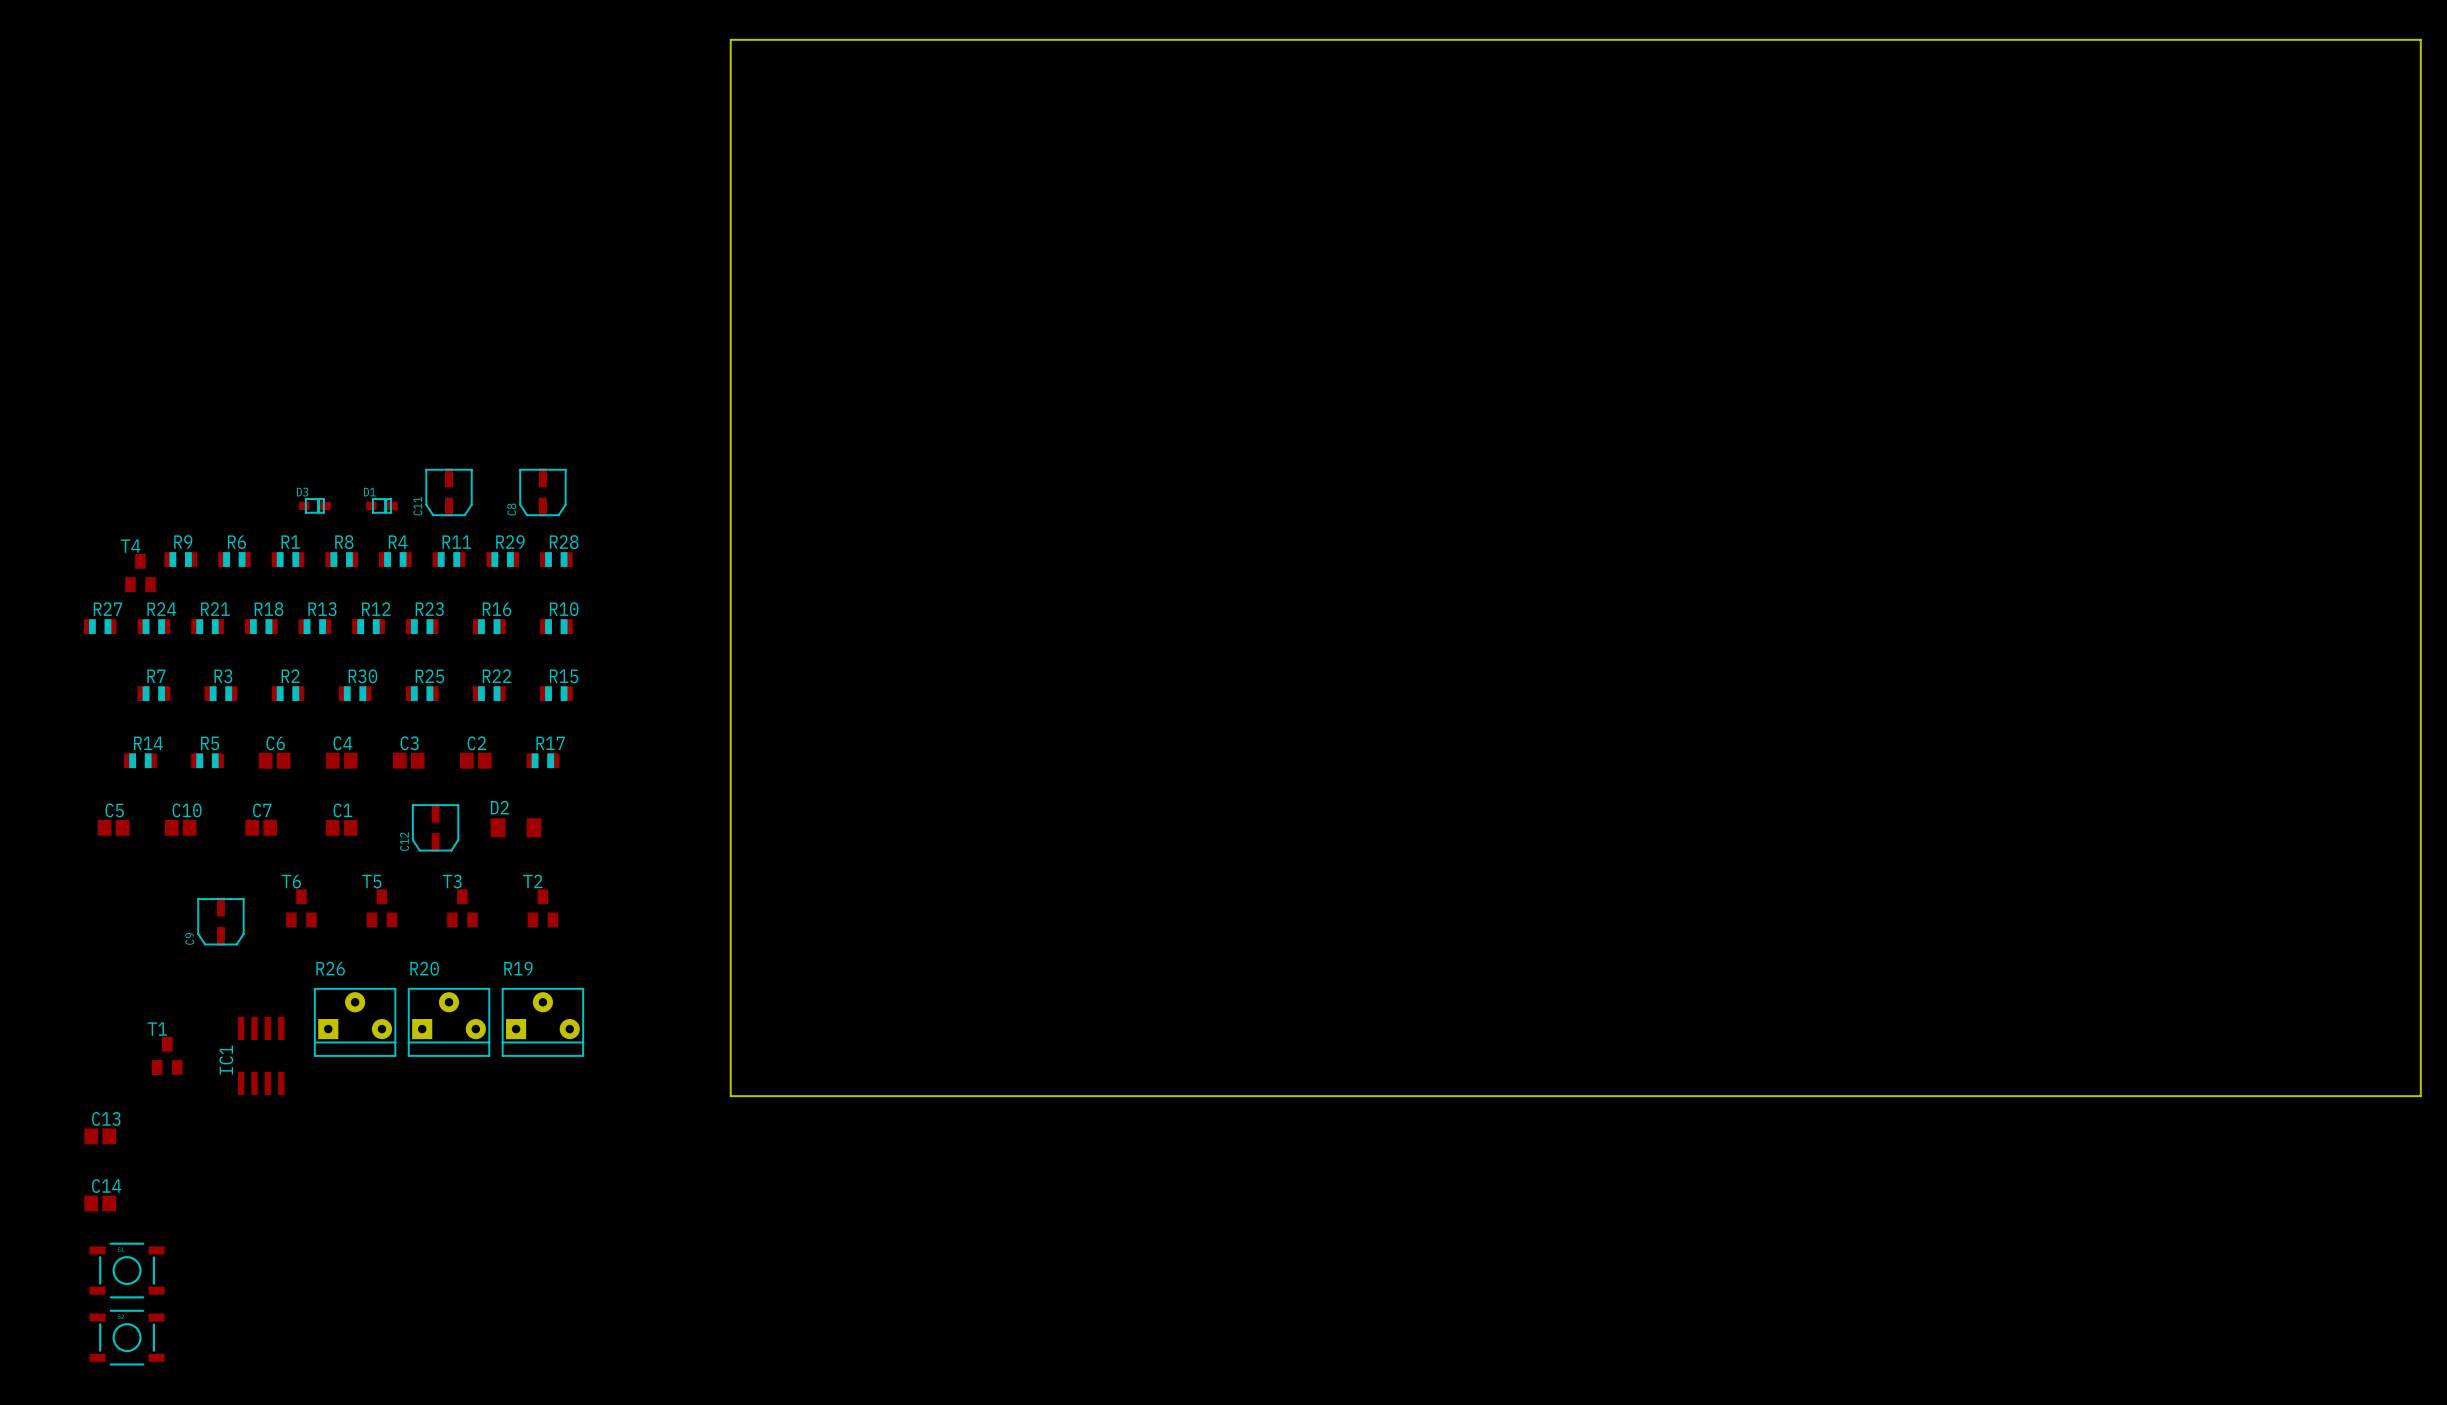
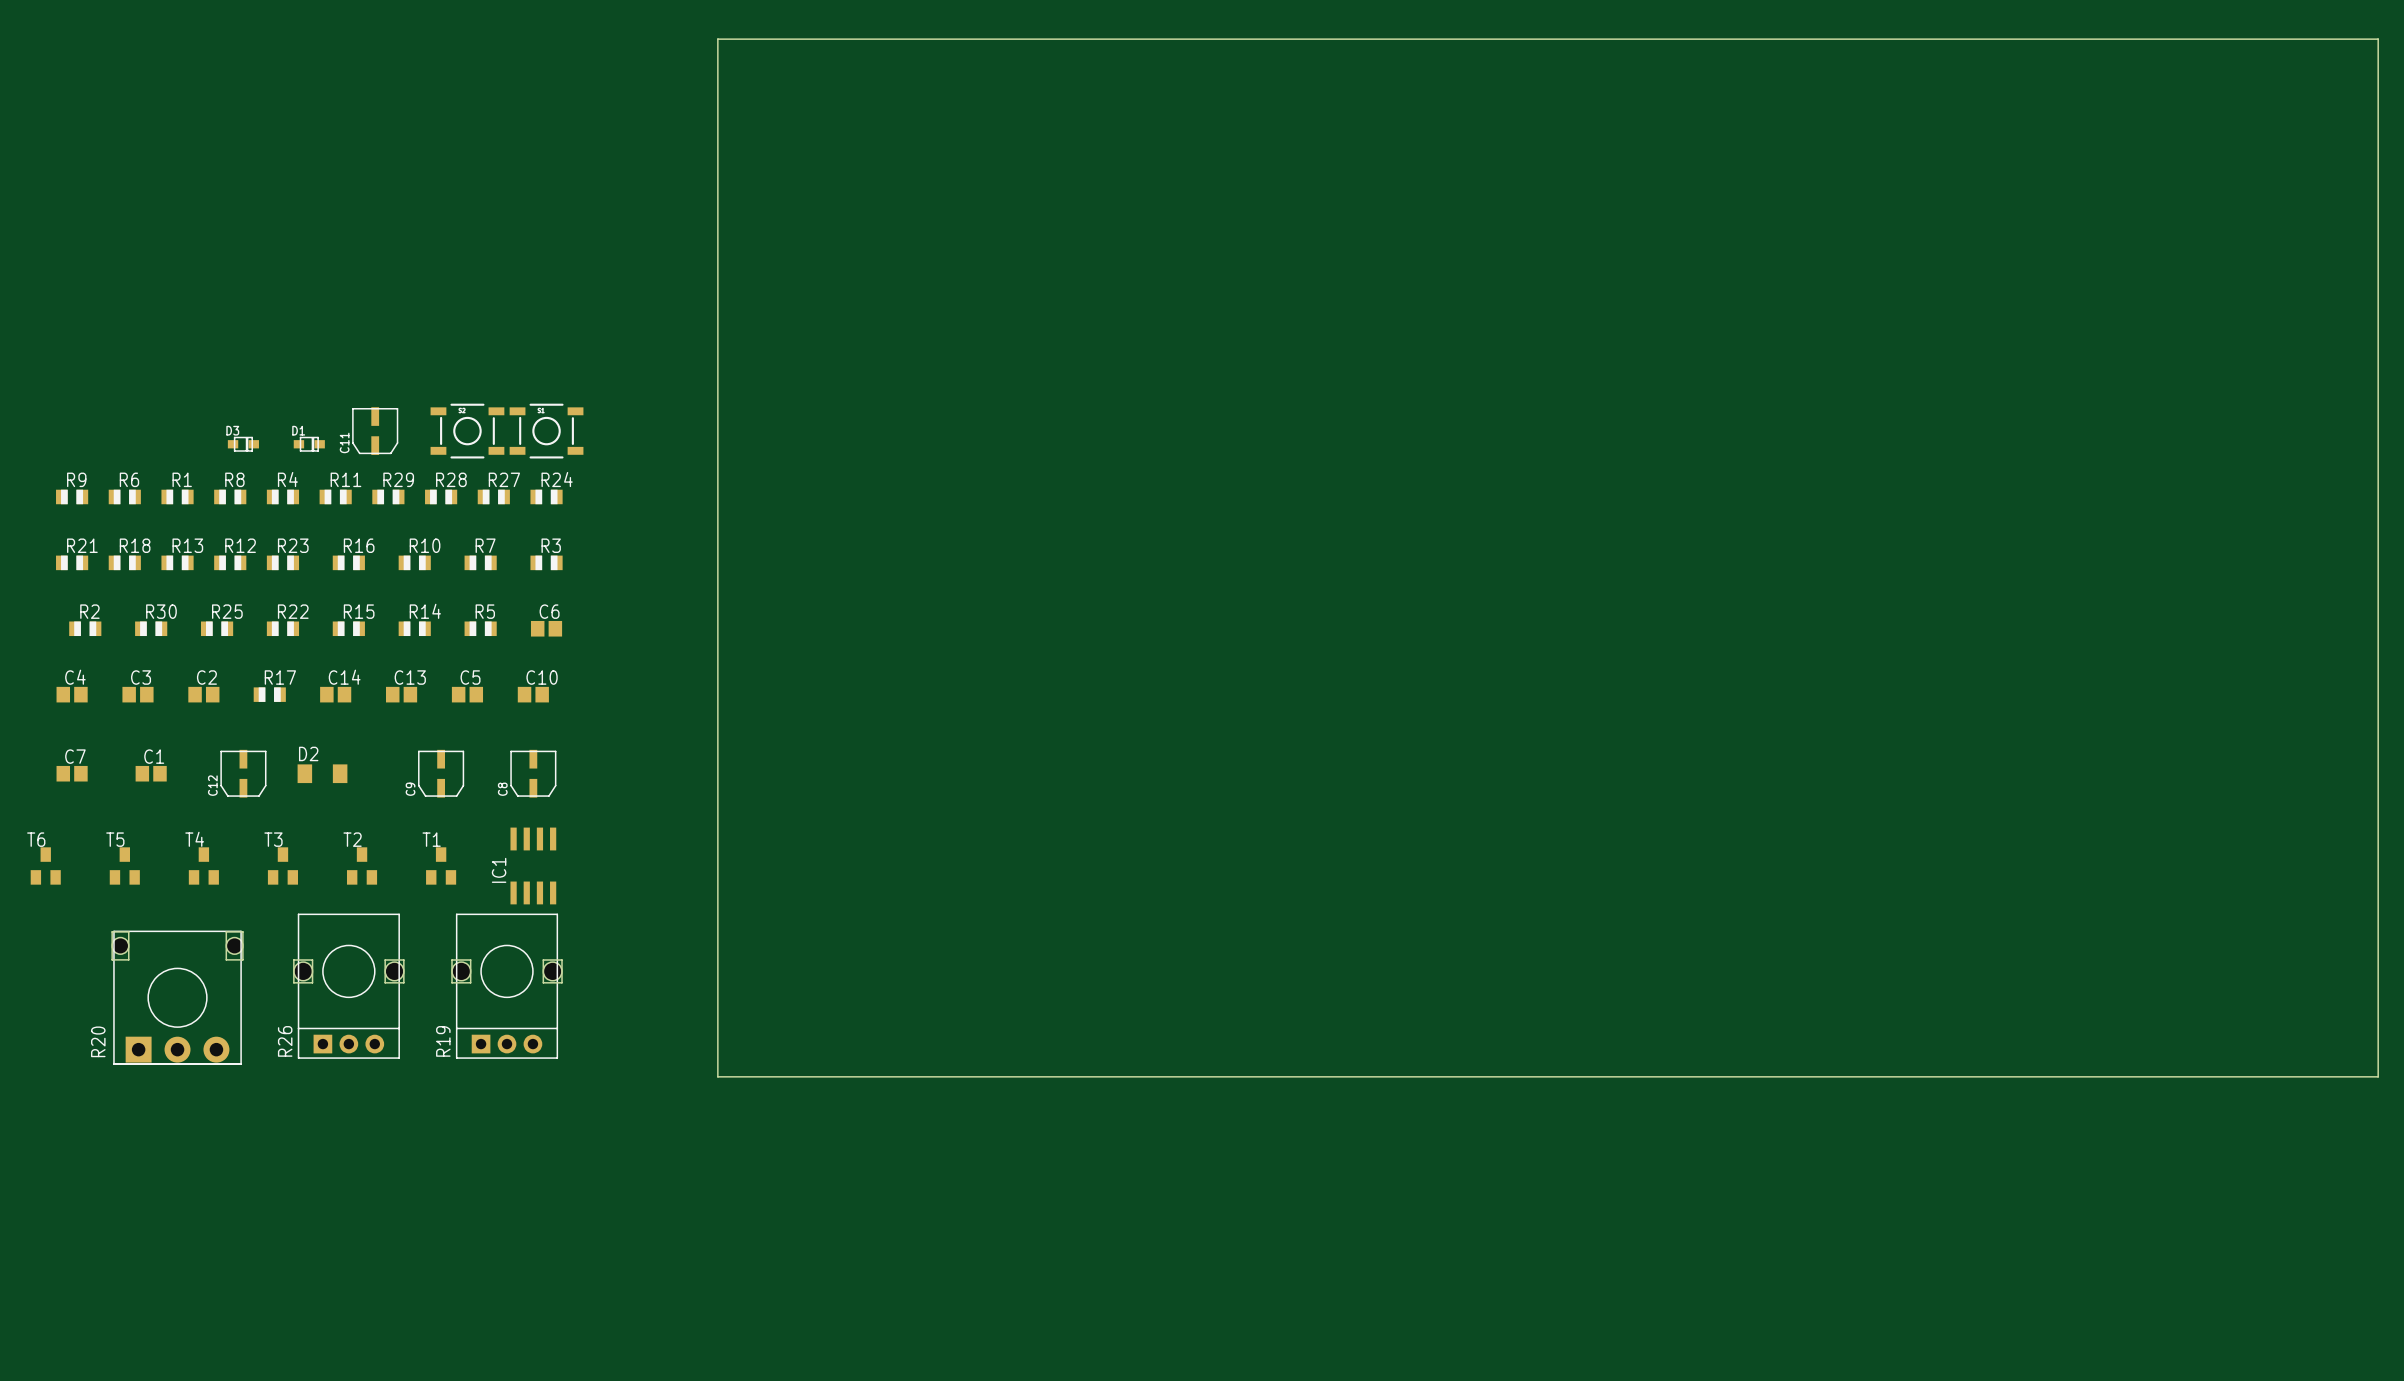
C11 position: (449, 492) -> (375, 431)
C8 position: (542, 492) -> (533, 773)
D3 position: (314, 505) -> (243, 444)
D1 position: (381, 505) -> (309, 444)
R9 position: (180, 559) -> (72, 496)
R6 position: (234, 559) -> (124, 496)
R1 position: (288, 559) -> (177, 496)
R8 position: (341, 559) -> (230, 496)
R4 position: (395, 559) -> (282, 496)
R11 position: (449, 559) -> (335, 496)
R29 position: (502, 559) -> (388, 496)
R28 position: (556, 559) -> (441, 496)
T4 position: (140, 572) -> (203, 865)
R27 position: (100, 626) -> (493, 496)
R24 position: (153, 626) -> (546, 496)
R21 position: (207, 626) -> (72, 562)
R18 position: (261, 626) -> (124, 562)
R13 position: (314, 626) -> (177, 562)
R12 position: (368, 626) -> (230, 562)
R23 position: (422, 626) -> (282, 562)
R16 position: (489, 626) -> (348, 562)
R10 position: (556, 626) -> (414, 562)
R7 position: (153, 693) -> (480, 562)
R3 position: (220, 693) -> (546, 562)
R2 position: (288, 693) -> (85, 628)
R30 position: (355, 693) -> (151, 628)
R25 position: (422, 693) -> (217, 628)
R22 position: (489, 693) -> (282, 628)
R15 position: (556, 693) -> (348, 628)
R14 position: (140, 760) -> (414, 628)
R5 position: (207, 760) -> (480, 628)
C6 position: (274, 760) -> (546, 628)
C4 position: (341, 760) -> (72, 694)
C3 position: (408, 760) -> (137, 694)
C2 position: (475, 760) -> (203, 694)
R17 position: (542, 760) -> (269, 694)
C5 position: (113, 827) -> (467, 694)
C10 position: (180, 827) -> (533, 694)
C7 position: (261, 827) -> (72, 773)
C1 position: (341, 827) -> (151, 773)
C12 position: (435, 827) -> (243, 773)
D2 position: (516, 827) -> (322, 773)
T6 position: (301, 908) -> (45, 865)
T5 position: (381, 908) -> (124, 865)
T3 position: (462, 908) -> (282, 865)
T2 position: (542, 908) -> (362, 865)
C9 position: (220, 921) -> (441, 773)
R26 name position: R26 (330, 968) -> R26 (285, 1041)
R20 name position: R20 (424, 968) -> R20 (98, 1041)
R19 name position: R19 (518, 968) -> R19 (443, 1041)
R26 footprint: [314, 988, 397, 1057] -> [293, 913, 405, 1059]
R20 footprint: [408, 988, 490, 1057] -> [111, 930, 244, 1065]
R19 footprint: [502, 988, 584, 1057] -> [451, 913, 563, 1059]
T1 position: (167, 1055) -> (441, 865)
IC1 position: (261, 1055) -> (533, 865)
C13 position: (100, 1136) -> (401, 694)
C14 position: (100, 1203) -> (335, 694)
part position: (127, 1270) -> (546, 431)
part position: (127, 1337) -> (467, 431)

